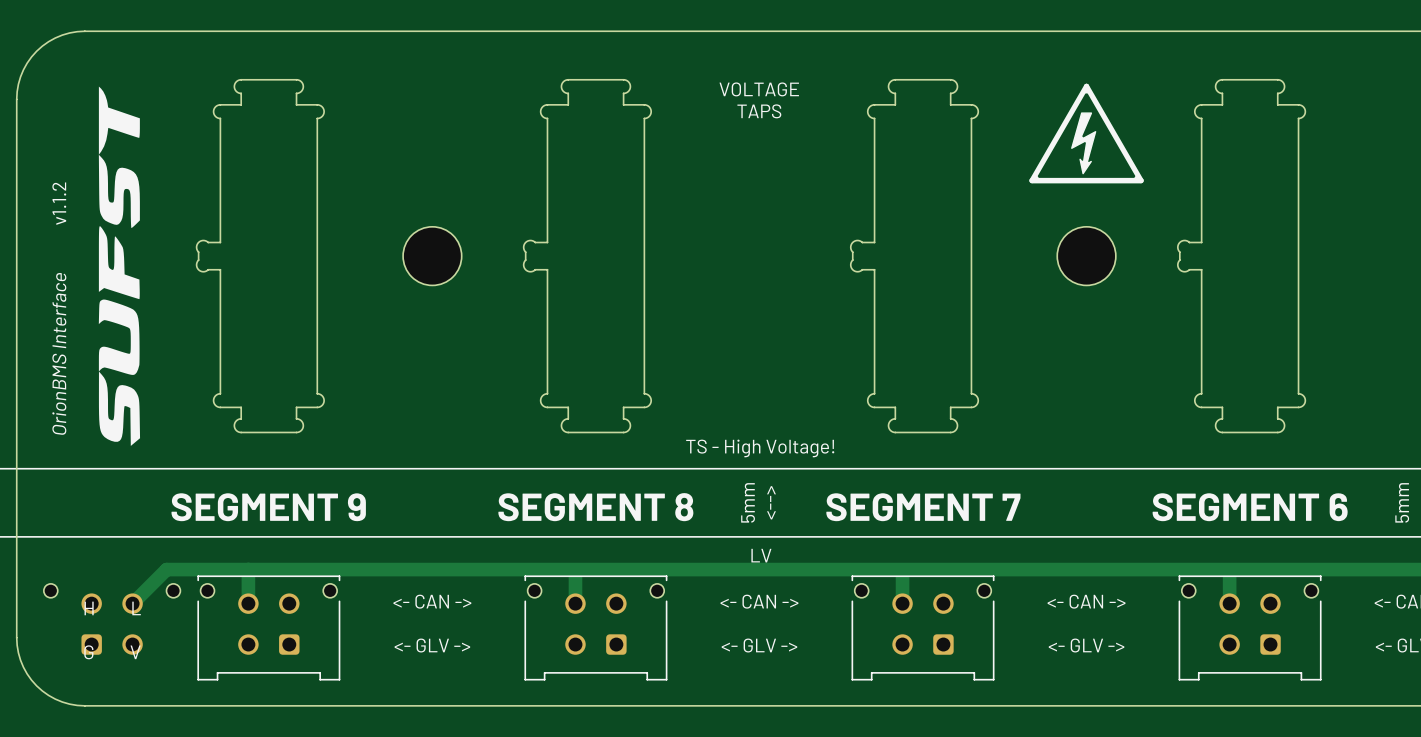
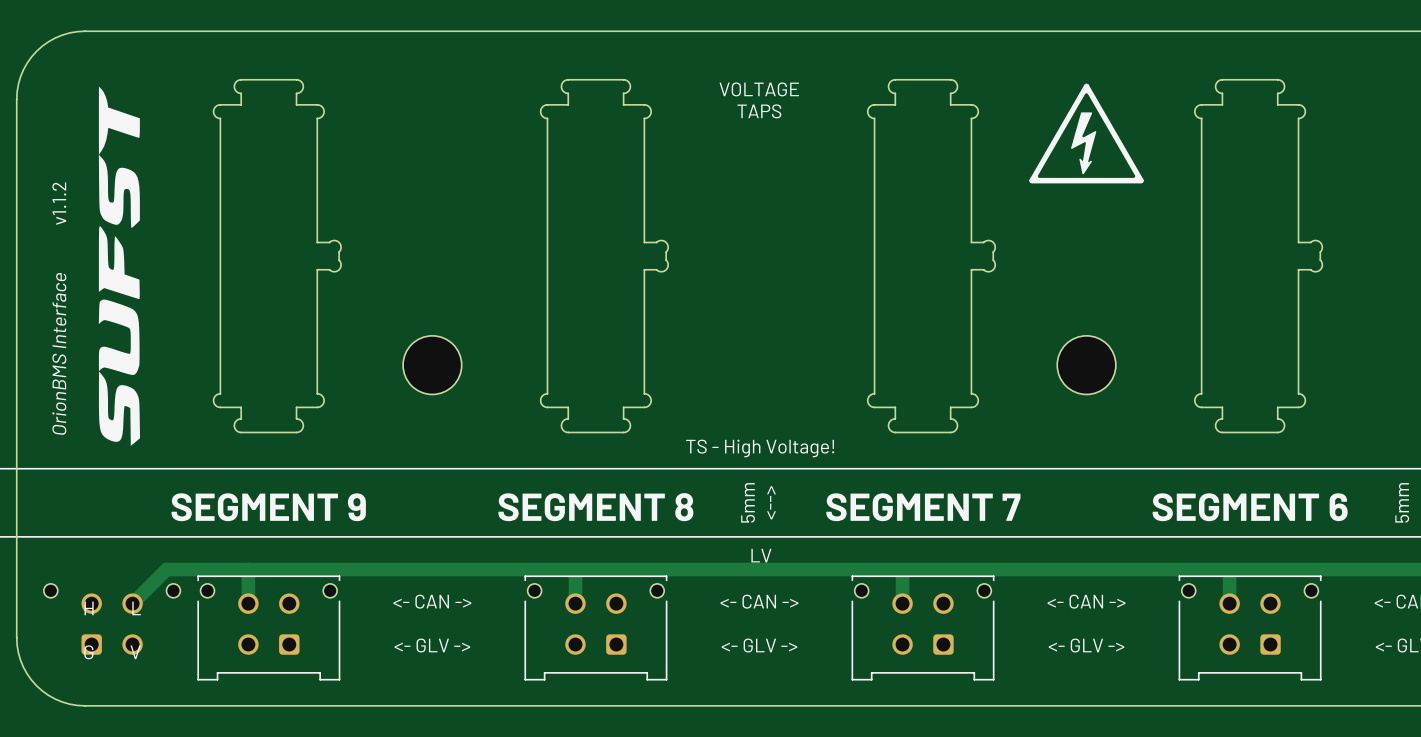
drawing: [195, 79, 325, 434] -> none
drawing: none -> [212, 79, 342, 434]
drawing: [522, 79, 652, 434] -> none
drawing: none -> [539, 79, 669, 434]
drawing: [850, 79, 979, 434] -> none
drawing: none -> [867, 79, 996, 434]
drawing: [1177, 79, 1307, 434] -> none
drawing: none -> [1194, 79, 1324, 434]
part position: (432, 256) -> (432, 365)
part position: (1086, 256) -> (1086, 365)

